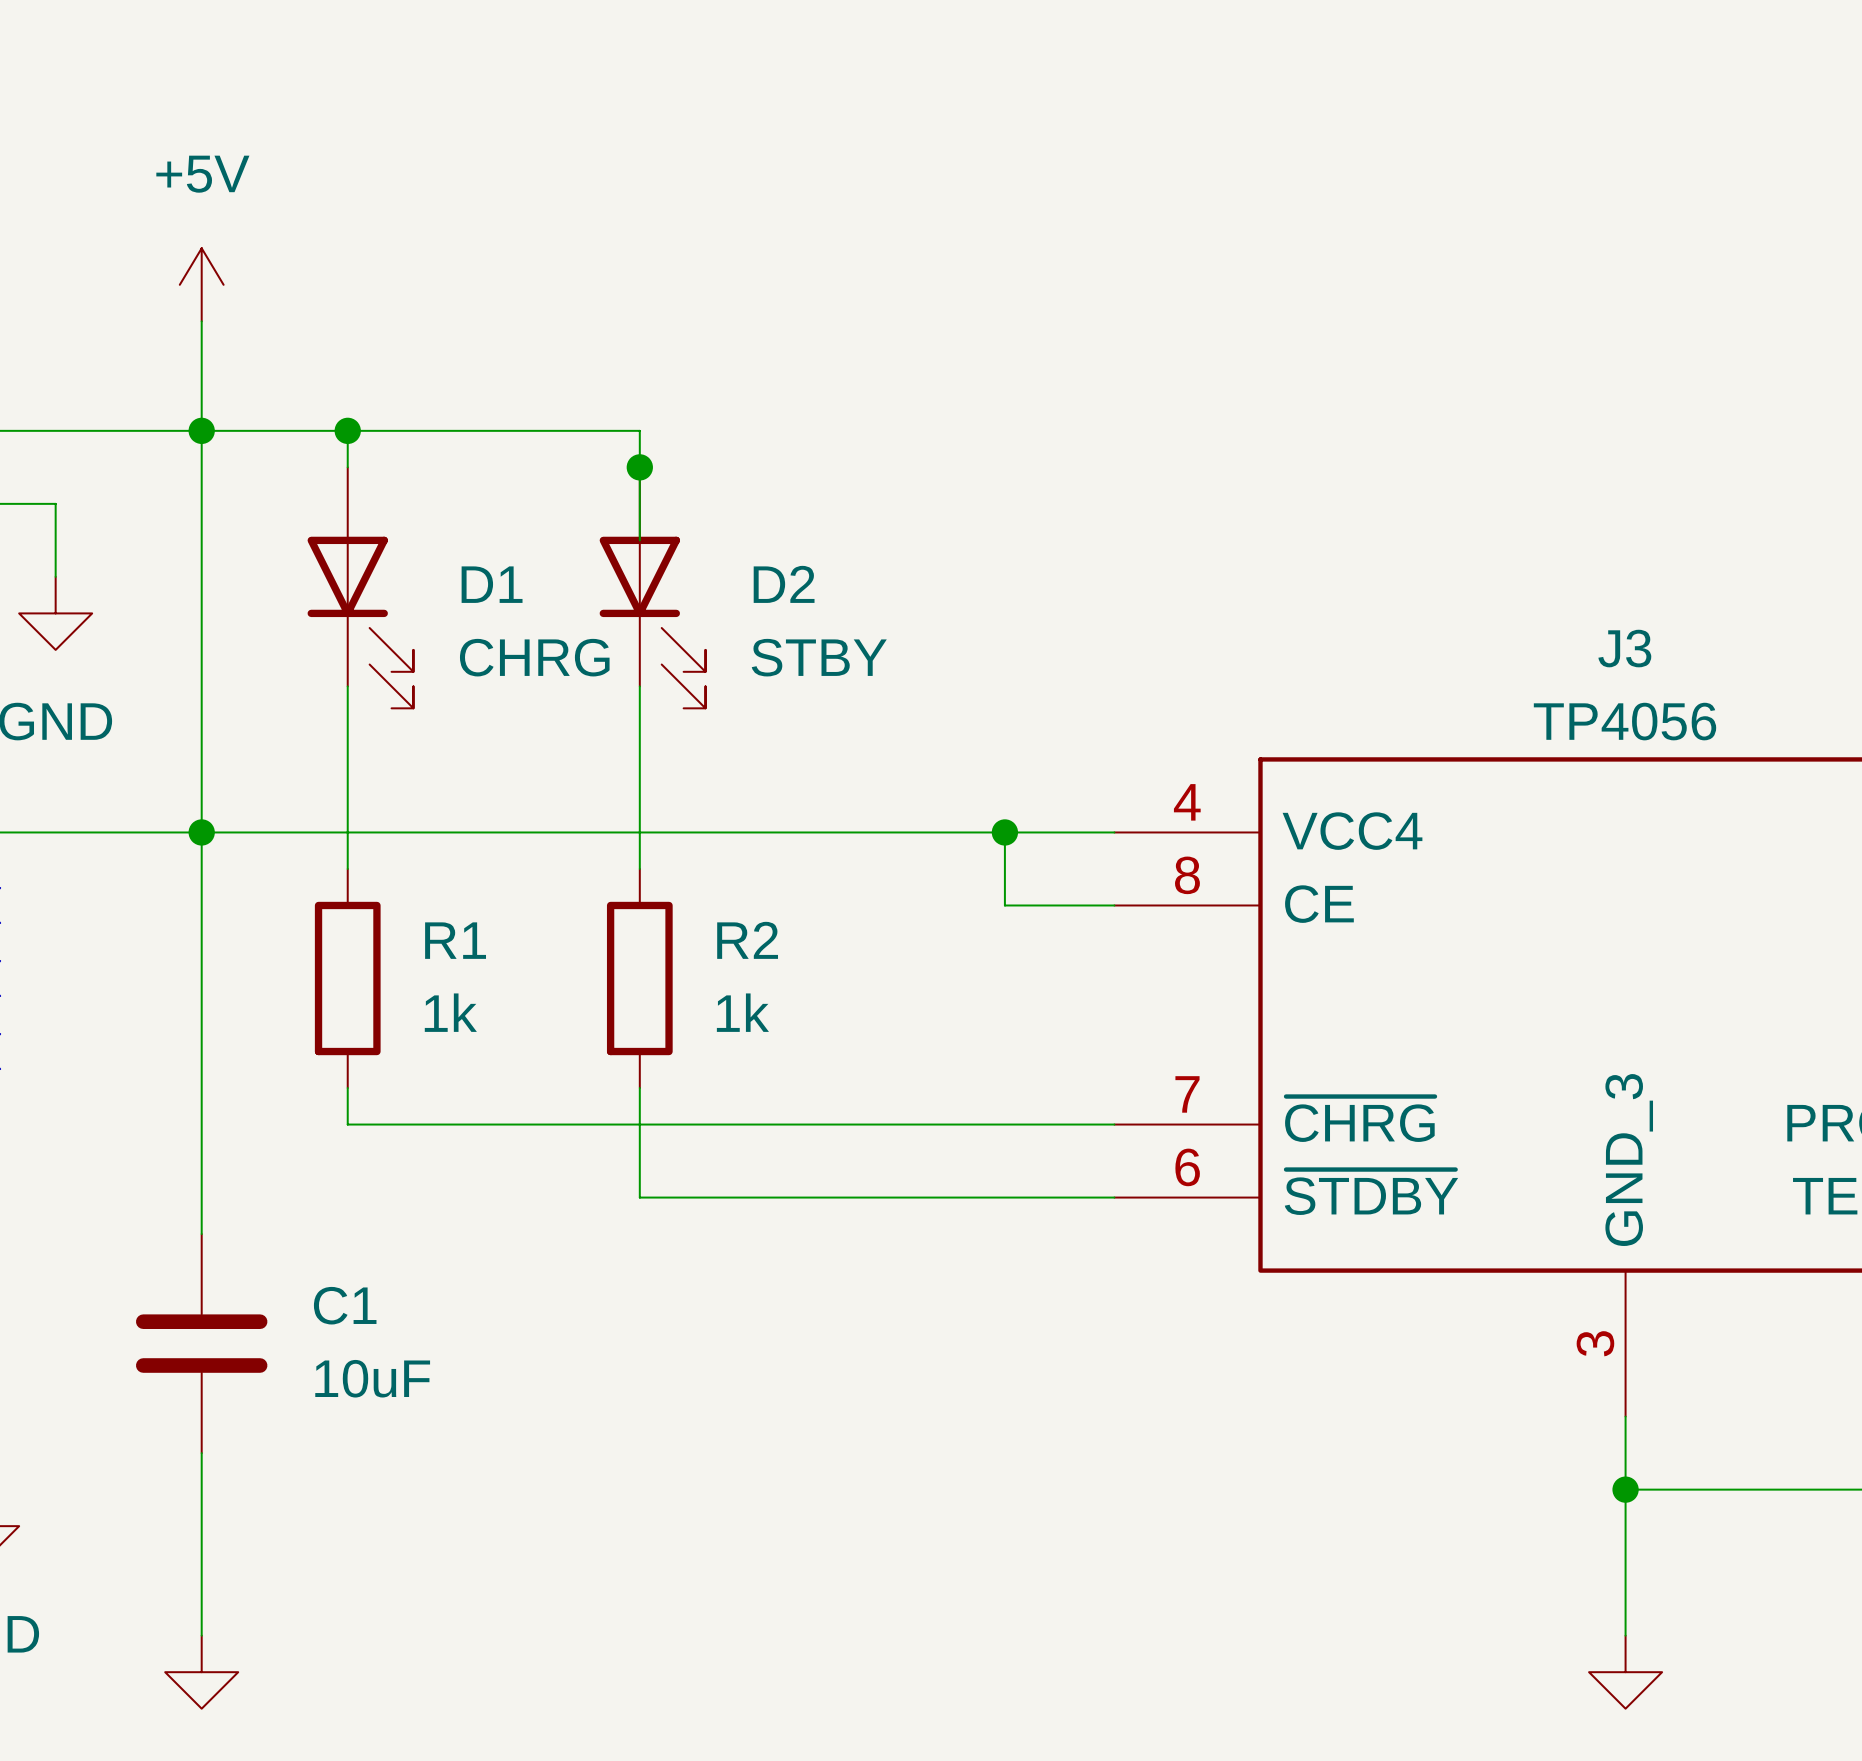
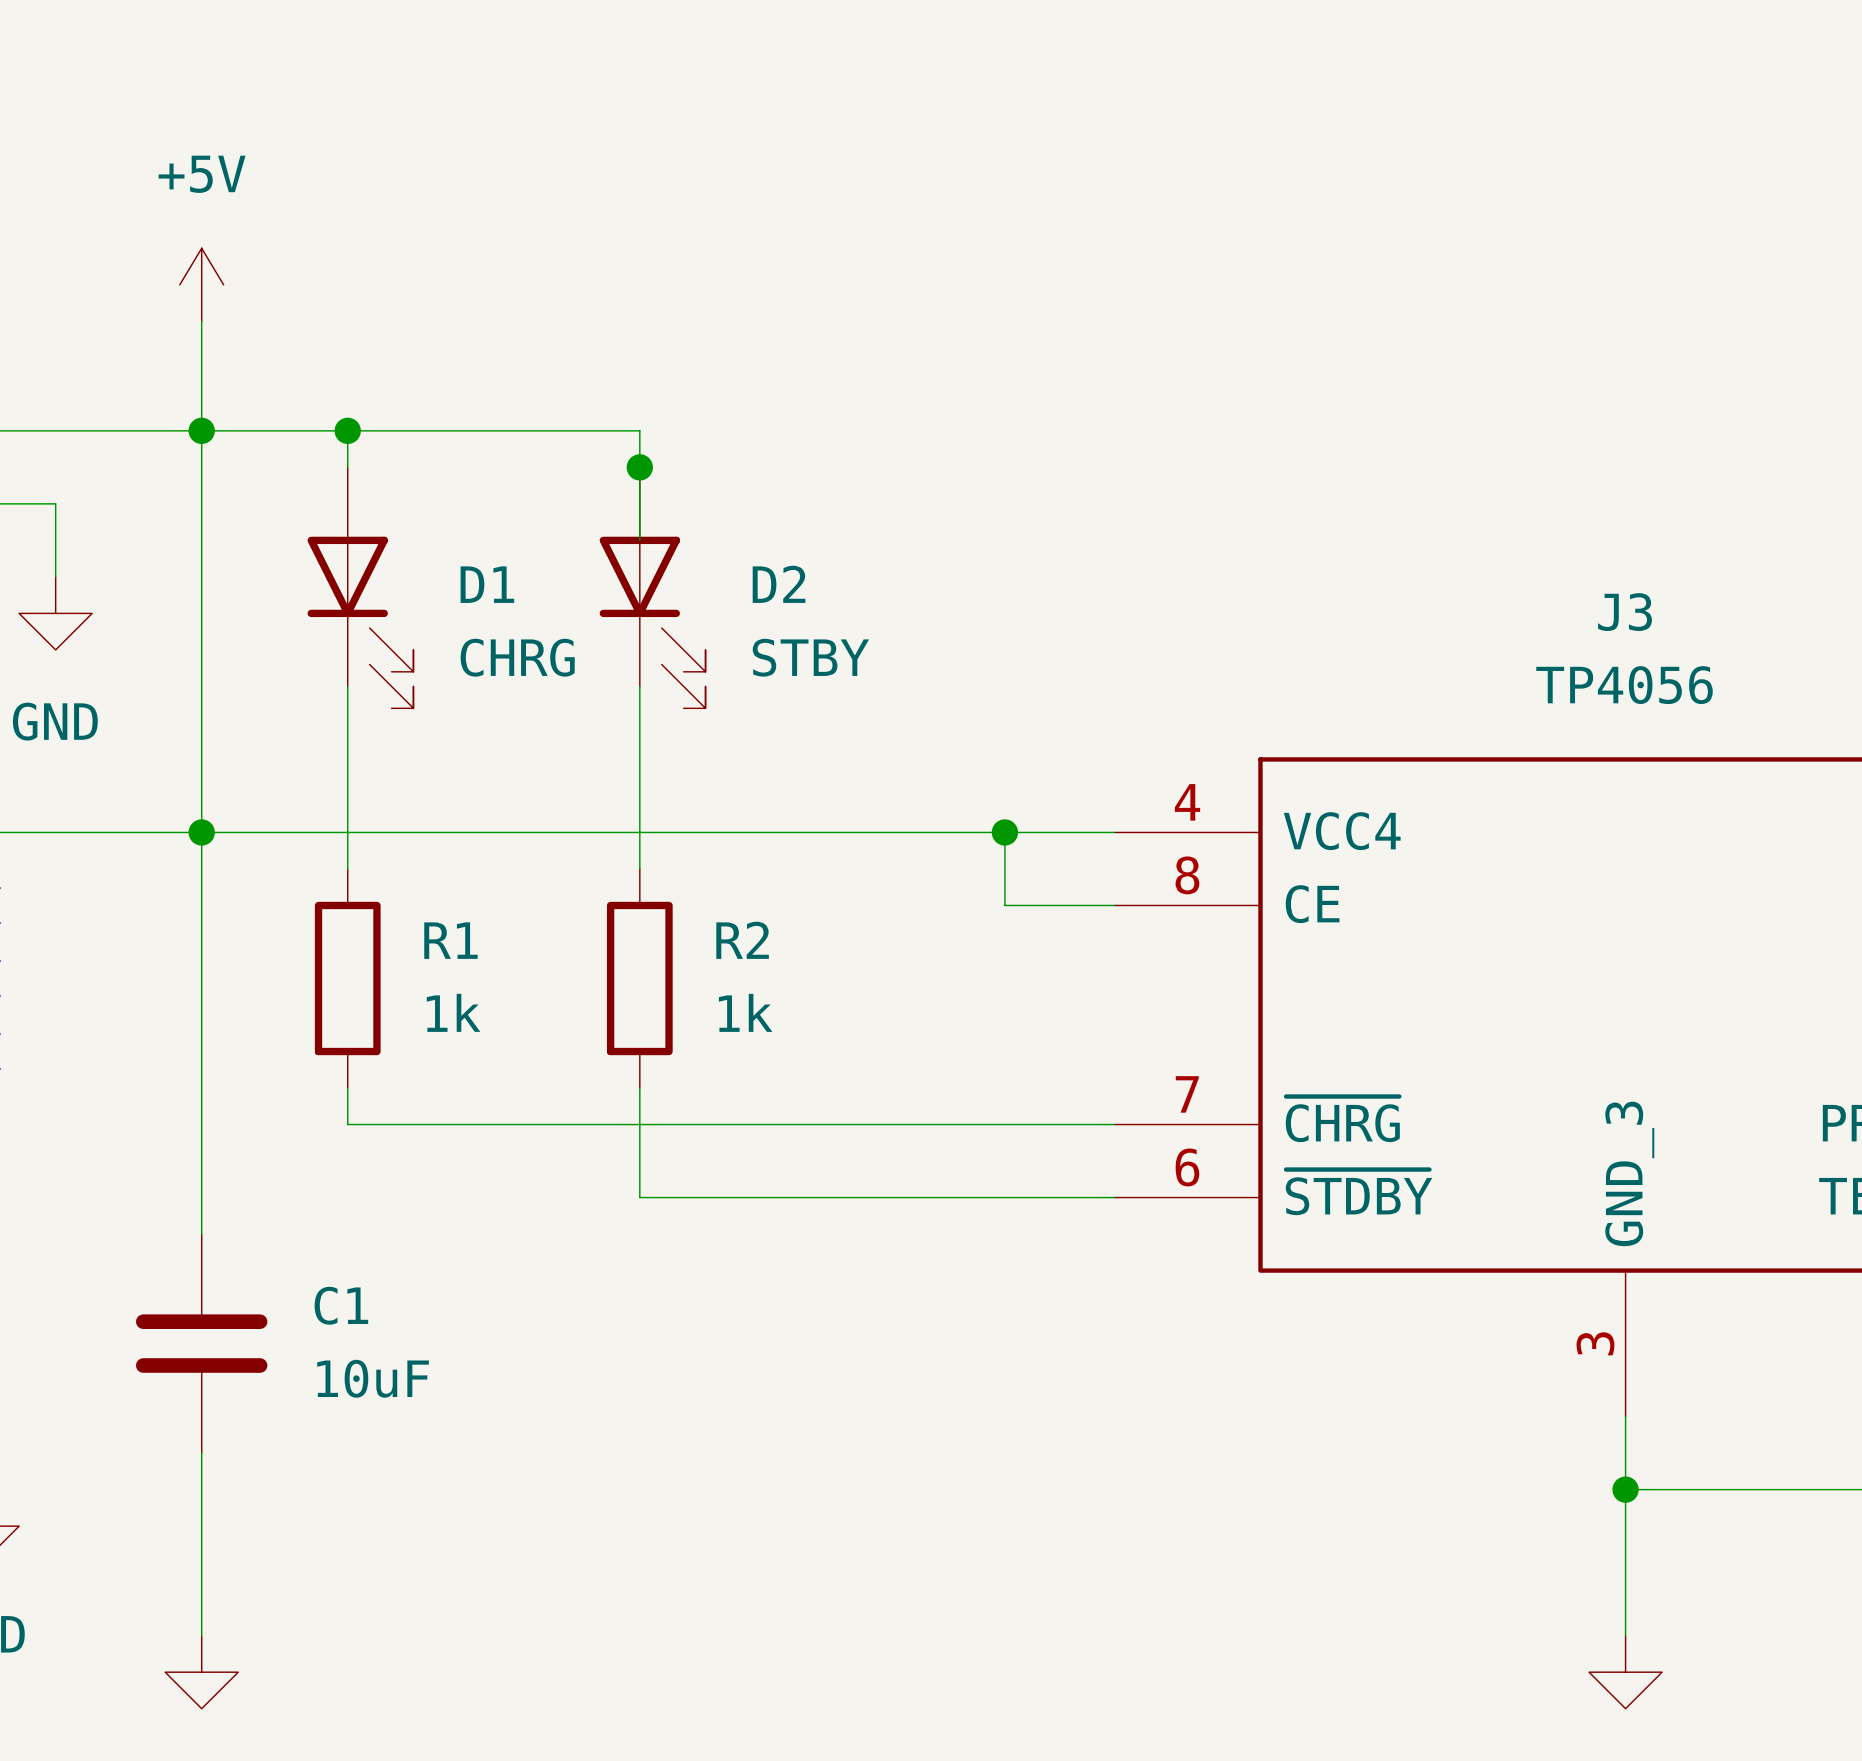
J3 name position: J3 (1624, 648) -> J3 (1625, 612)
J3 value position: TP4056 (1625, 721) -> TP4056 (1624, 685)

